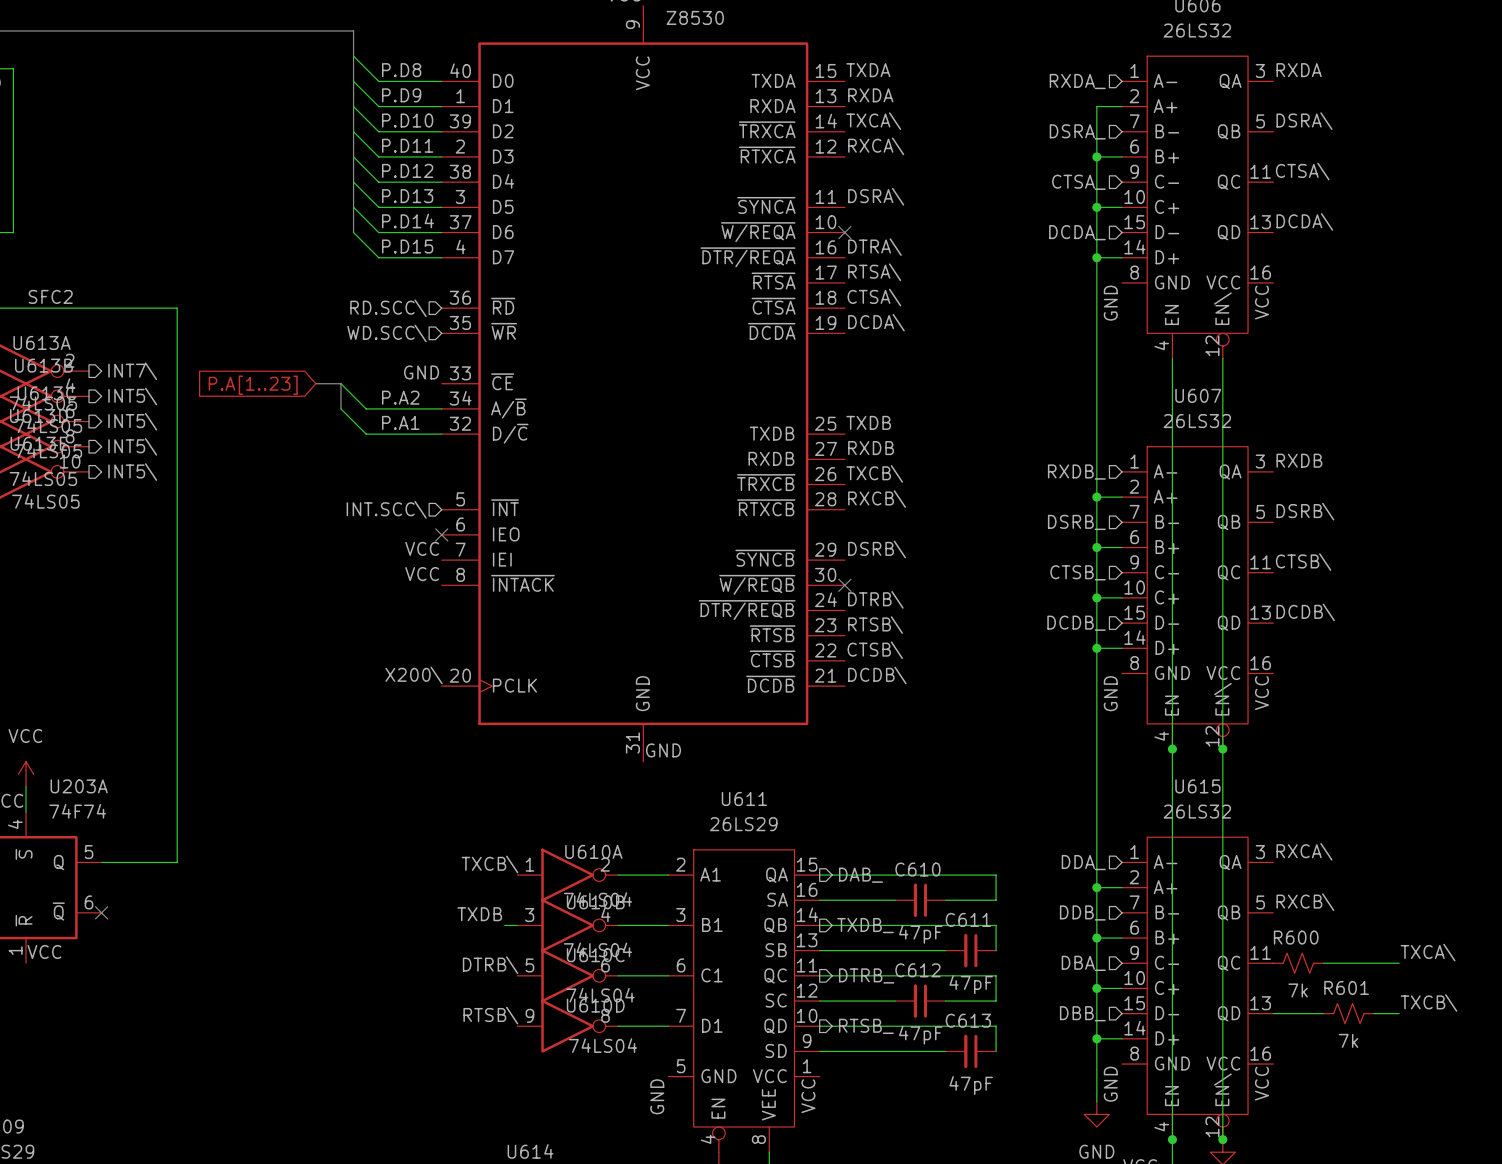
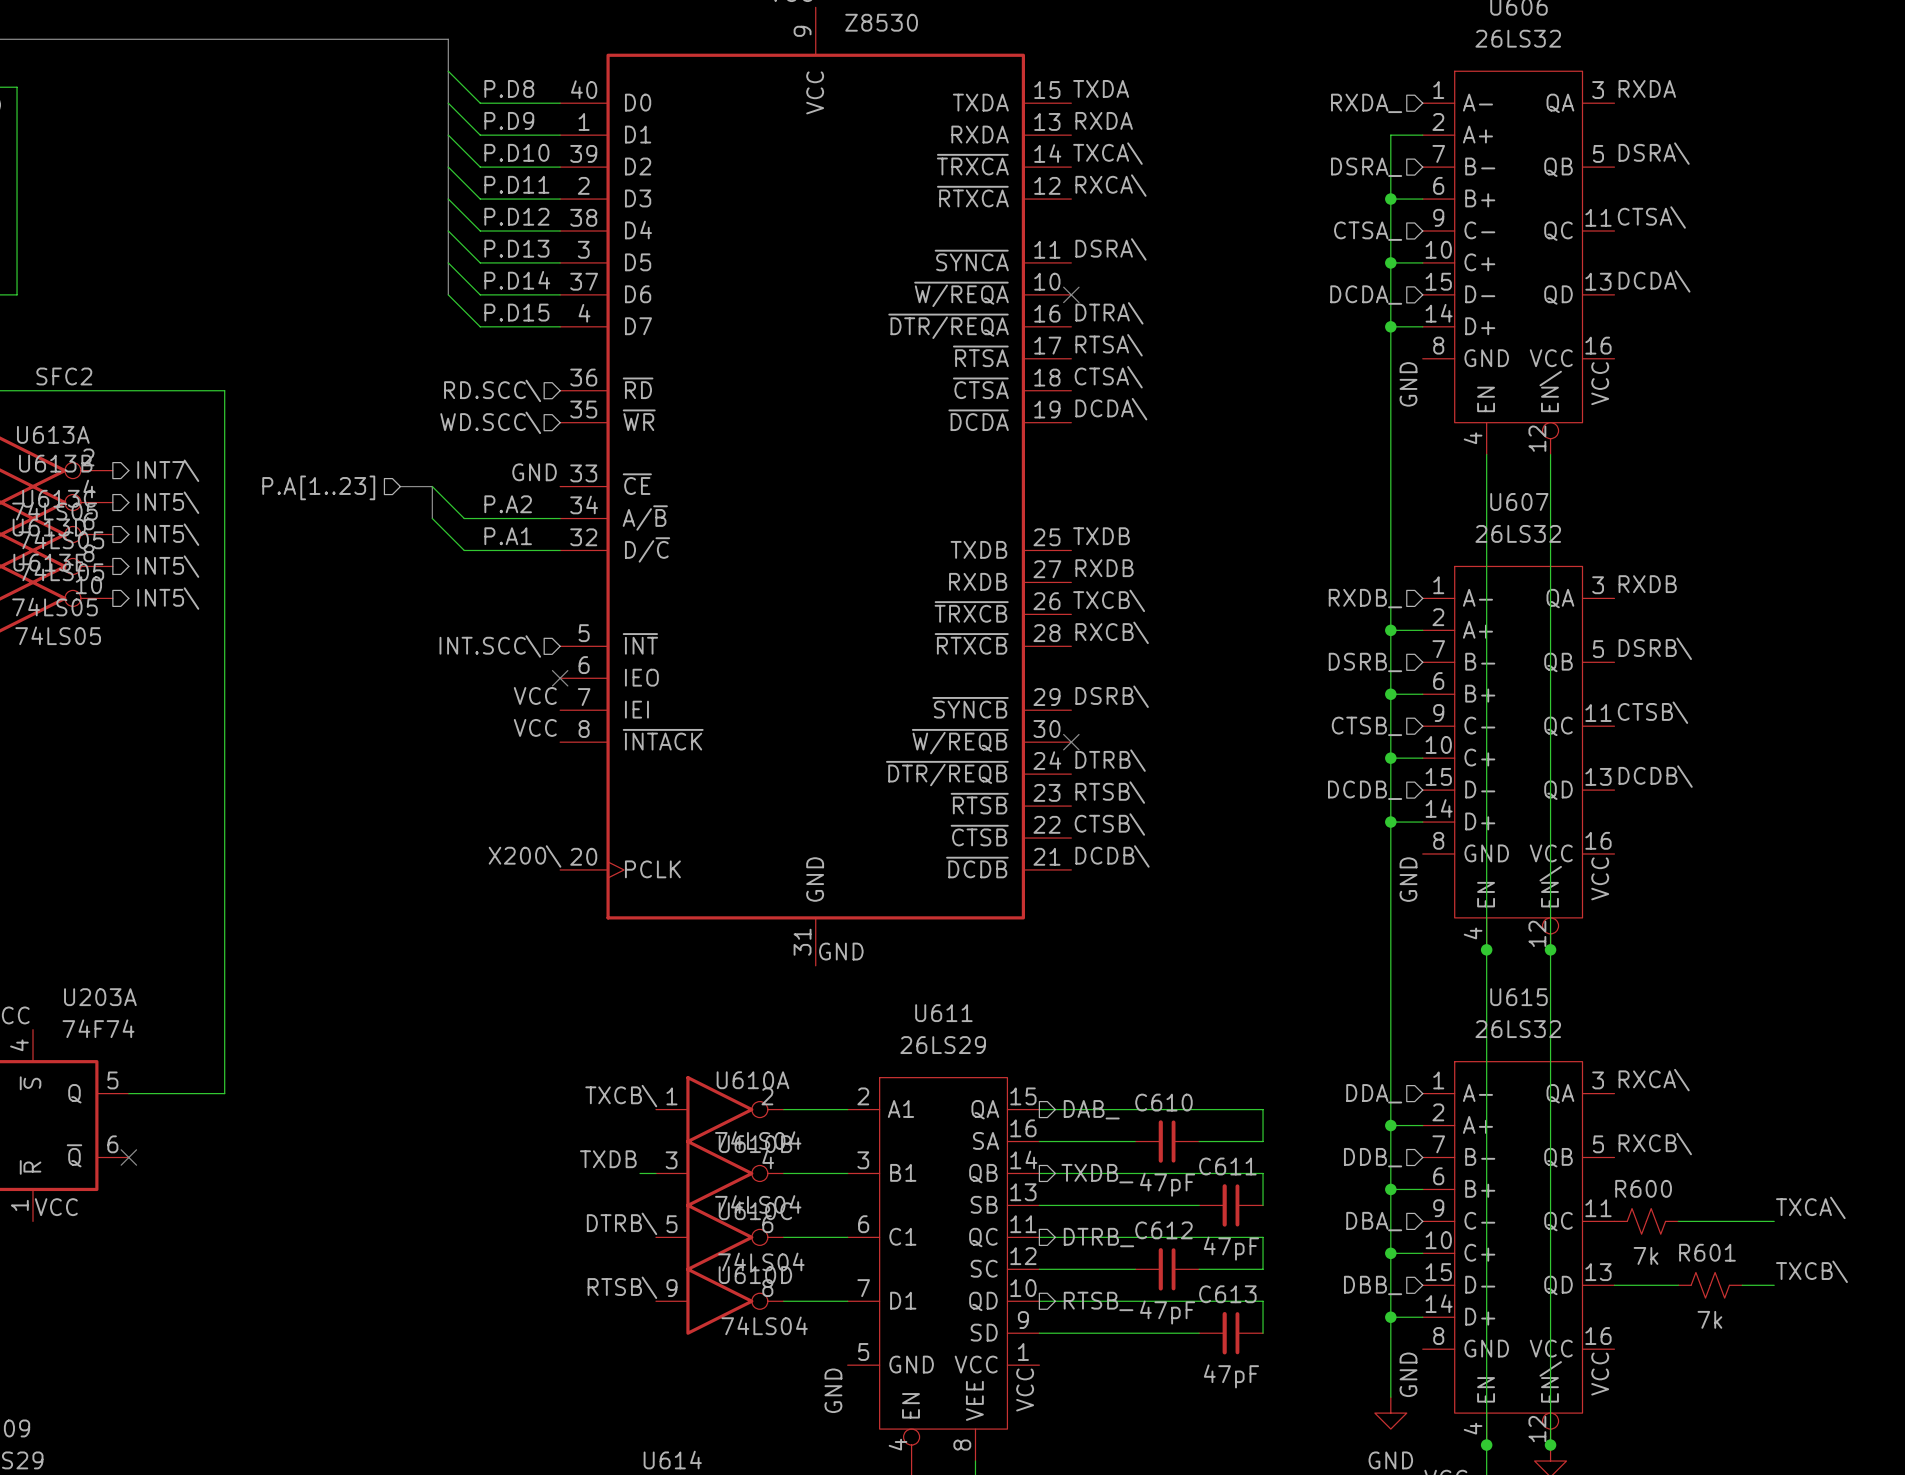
hierarchical label: none -> P.A[1..23] (318, 487)
global label: P.A[1..23] (253, 385) -> none
power symbol: VCC (26, 774) -> none
wire: (26, 786) (26, 812) -> none

